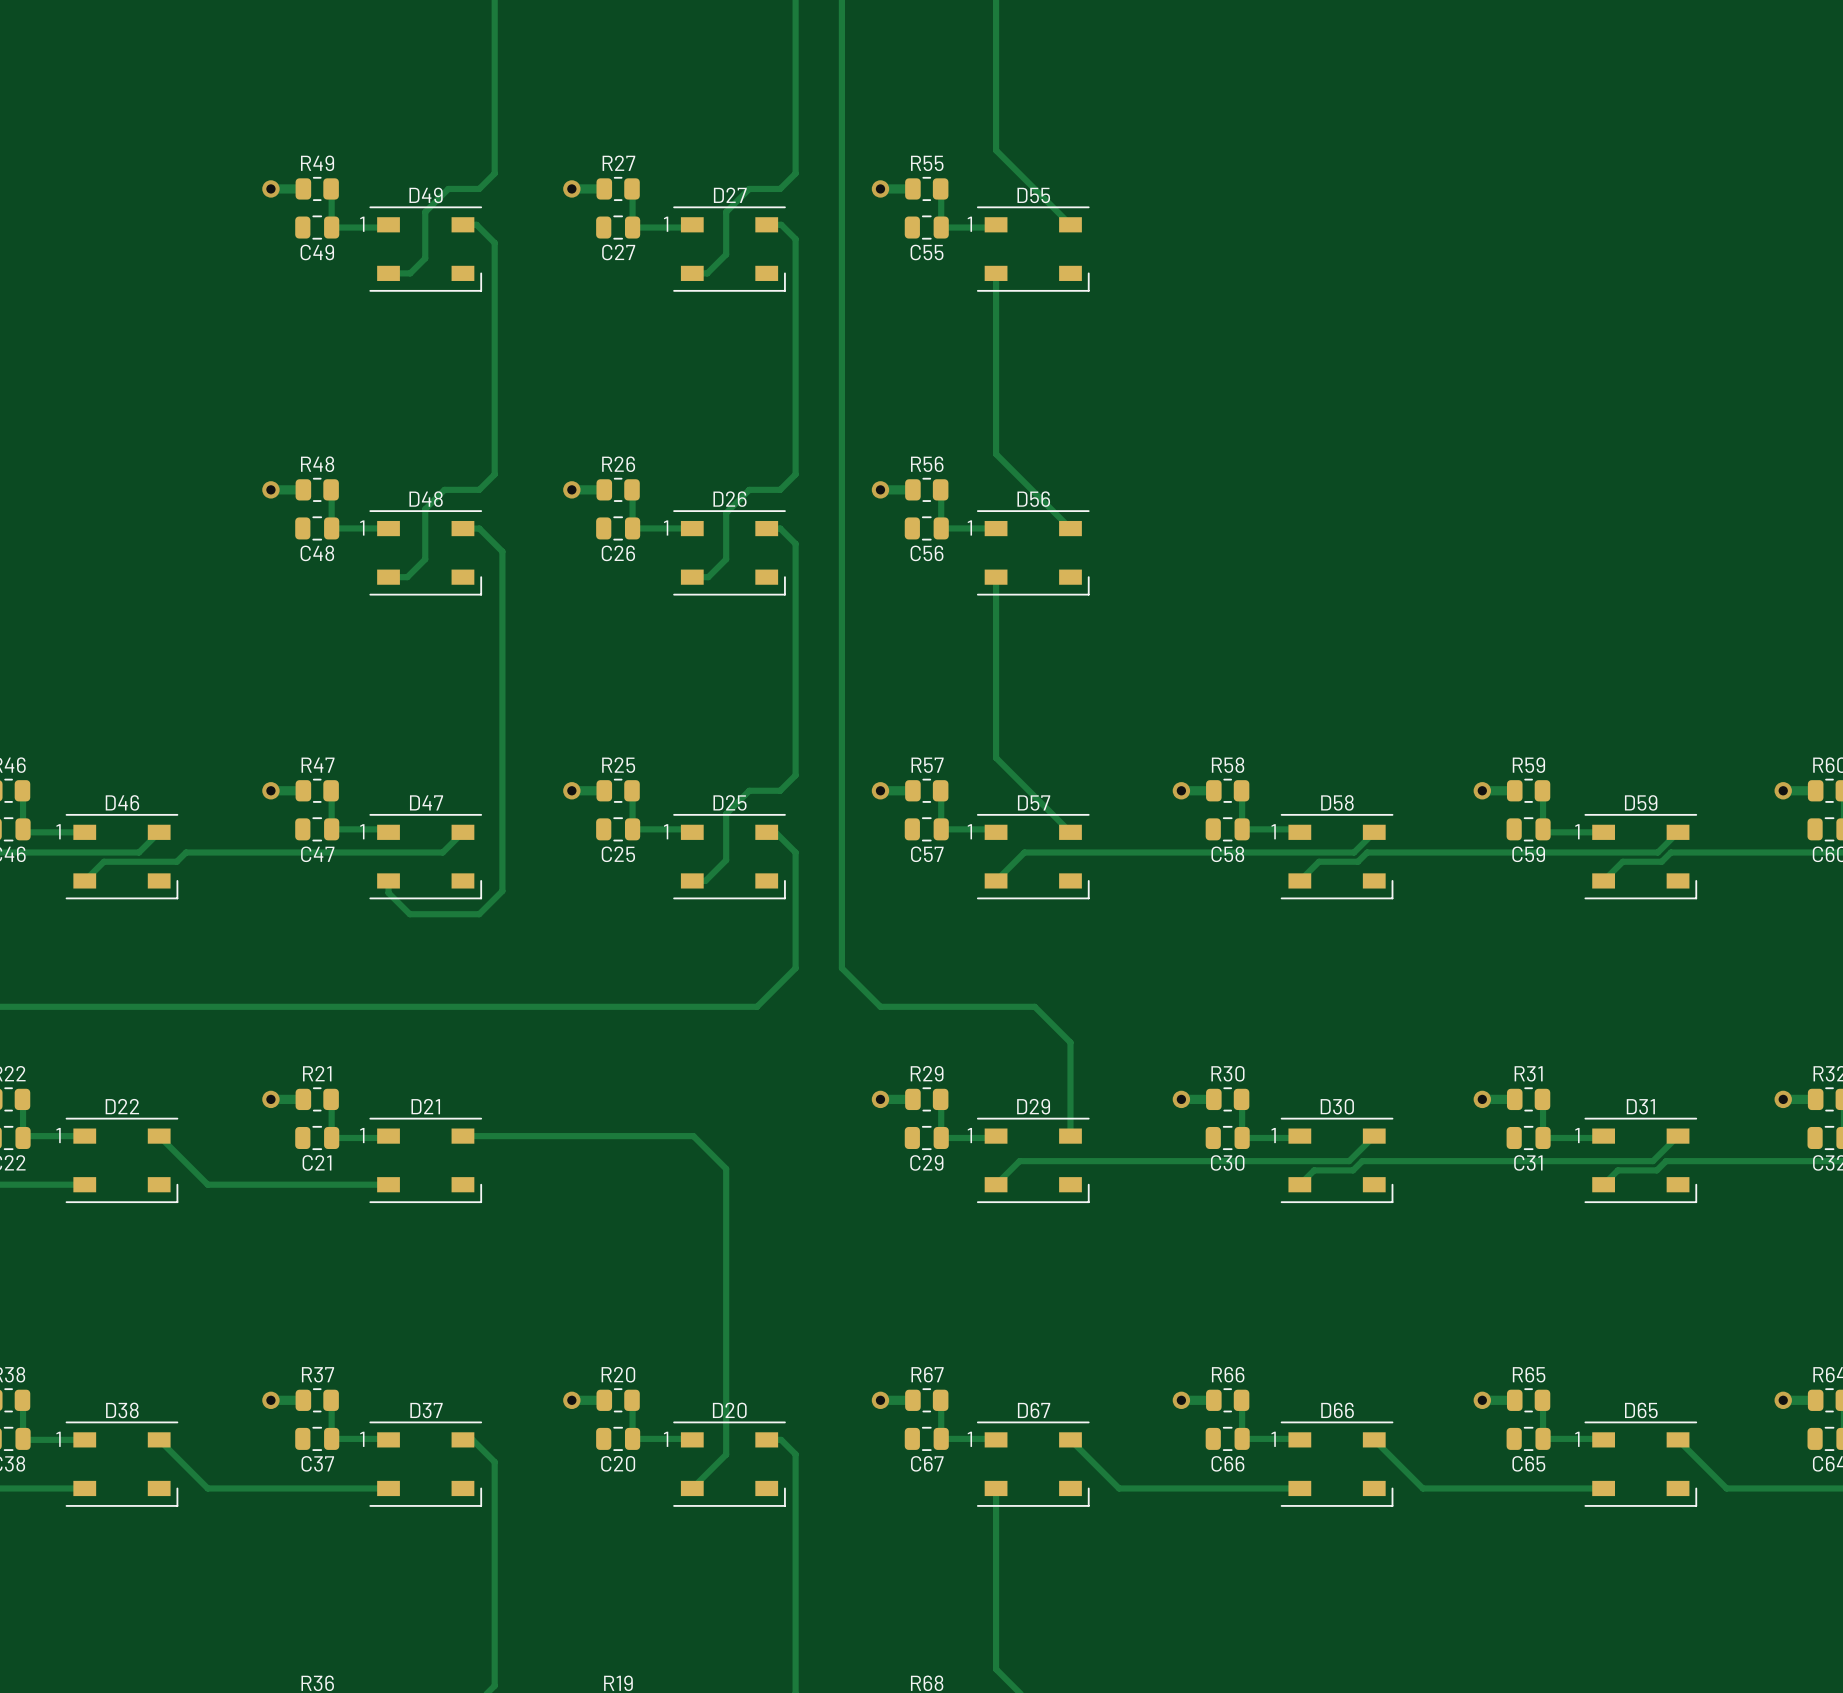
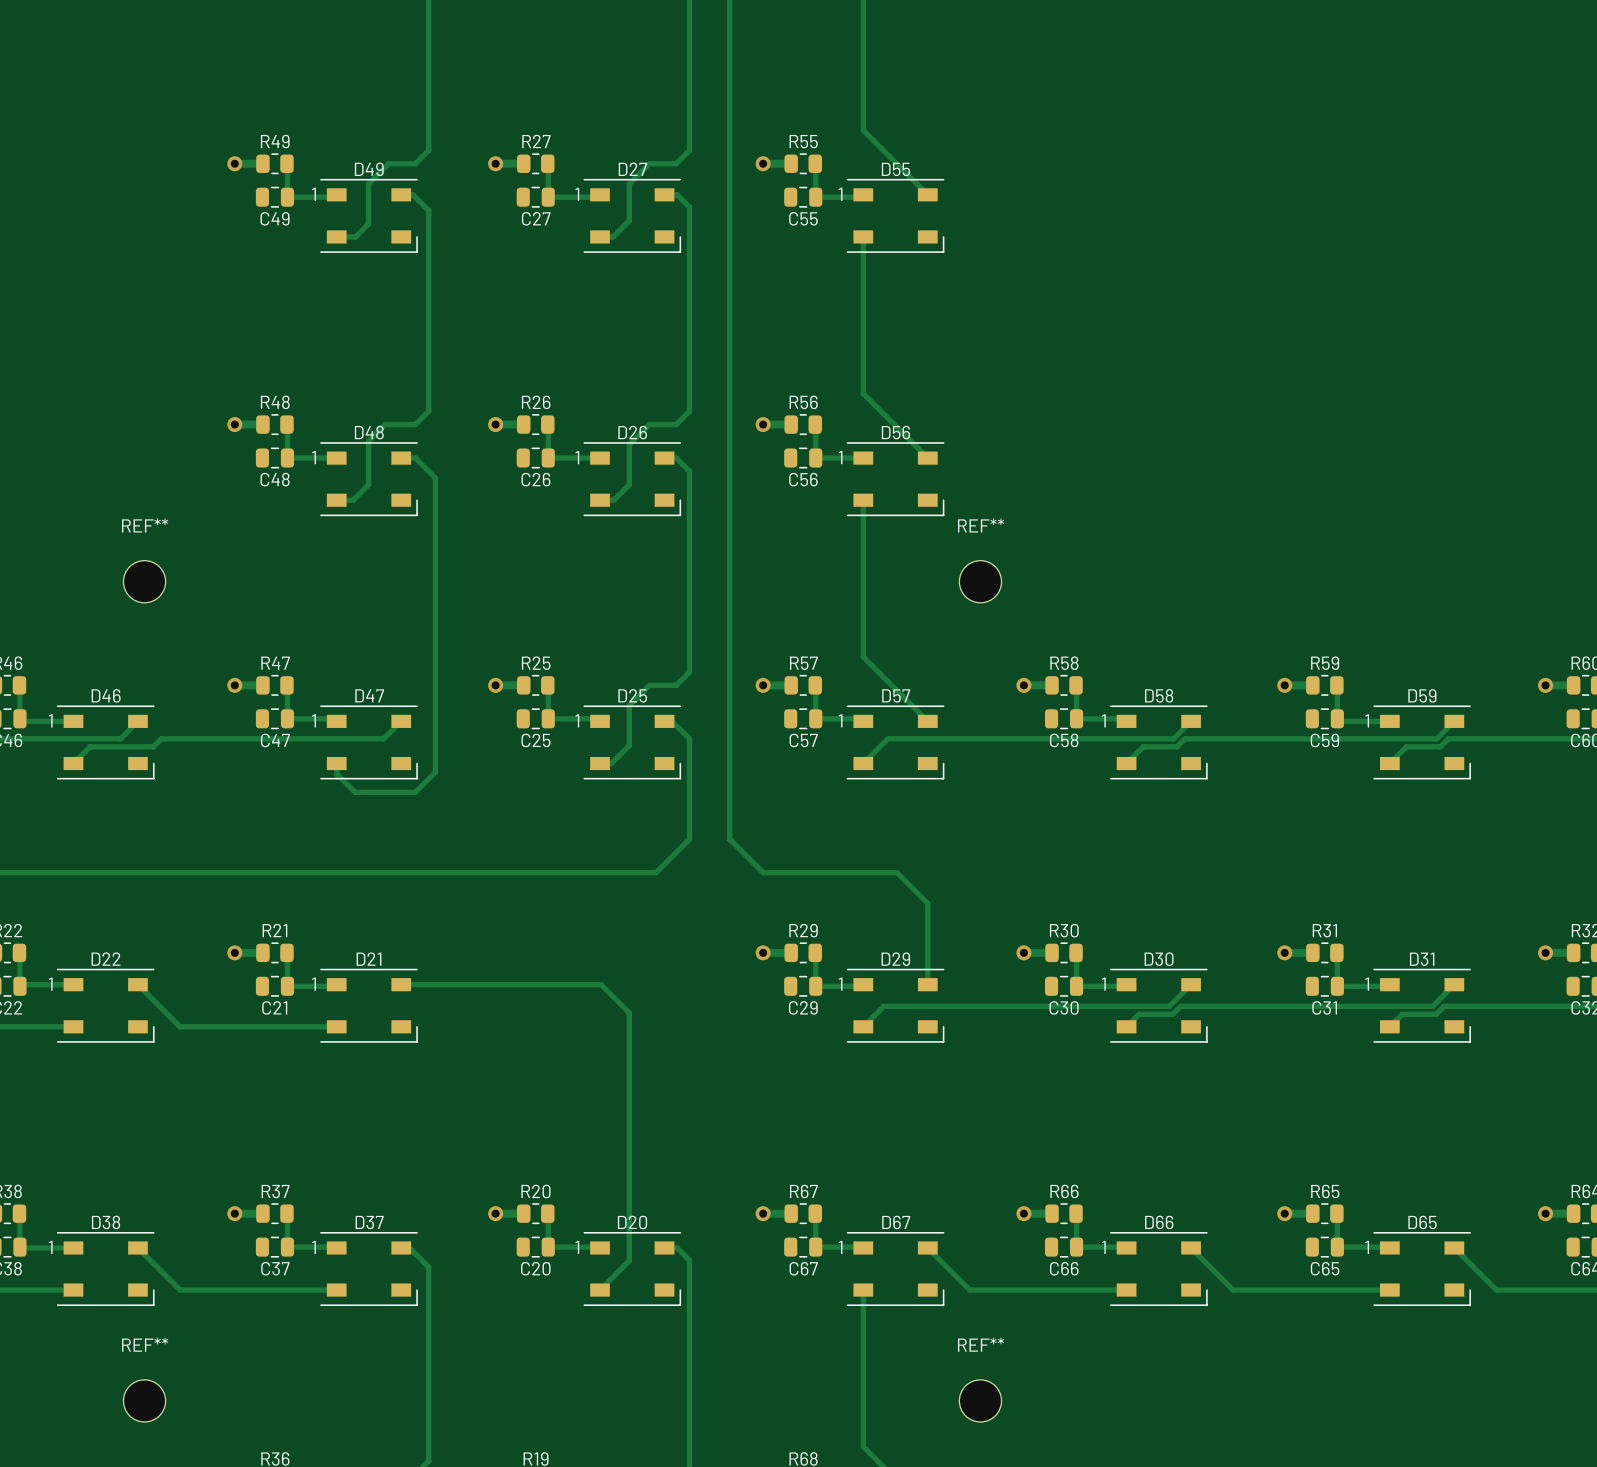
REF**: none -> (144, 581)
REF**: none -> (980, 581)
REF**: none -> (144, 1400)
REF**: none -> (980, 1400)

